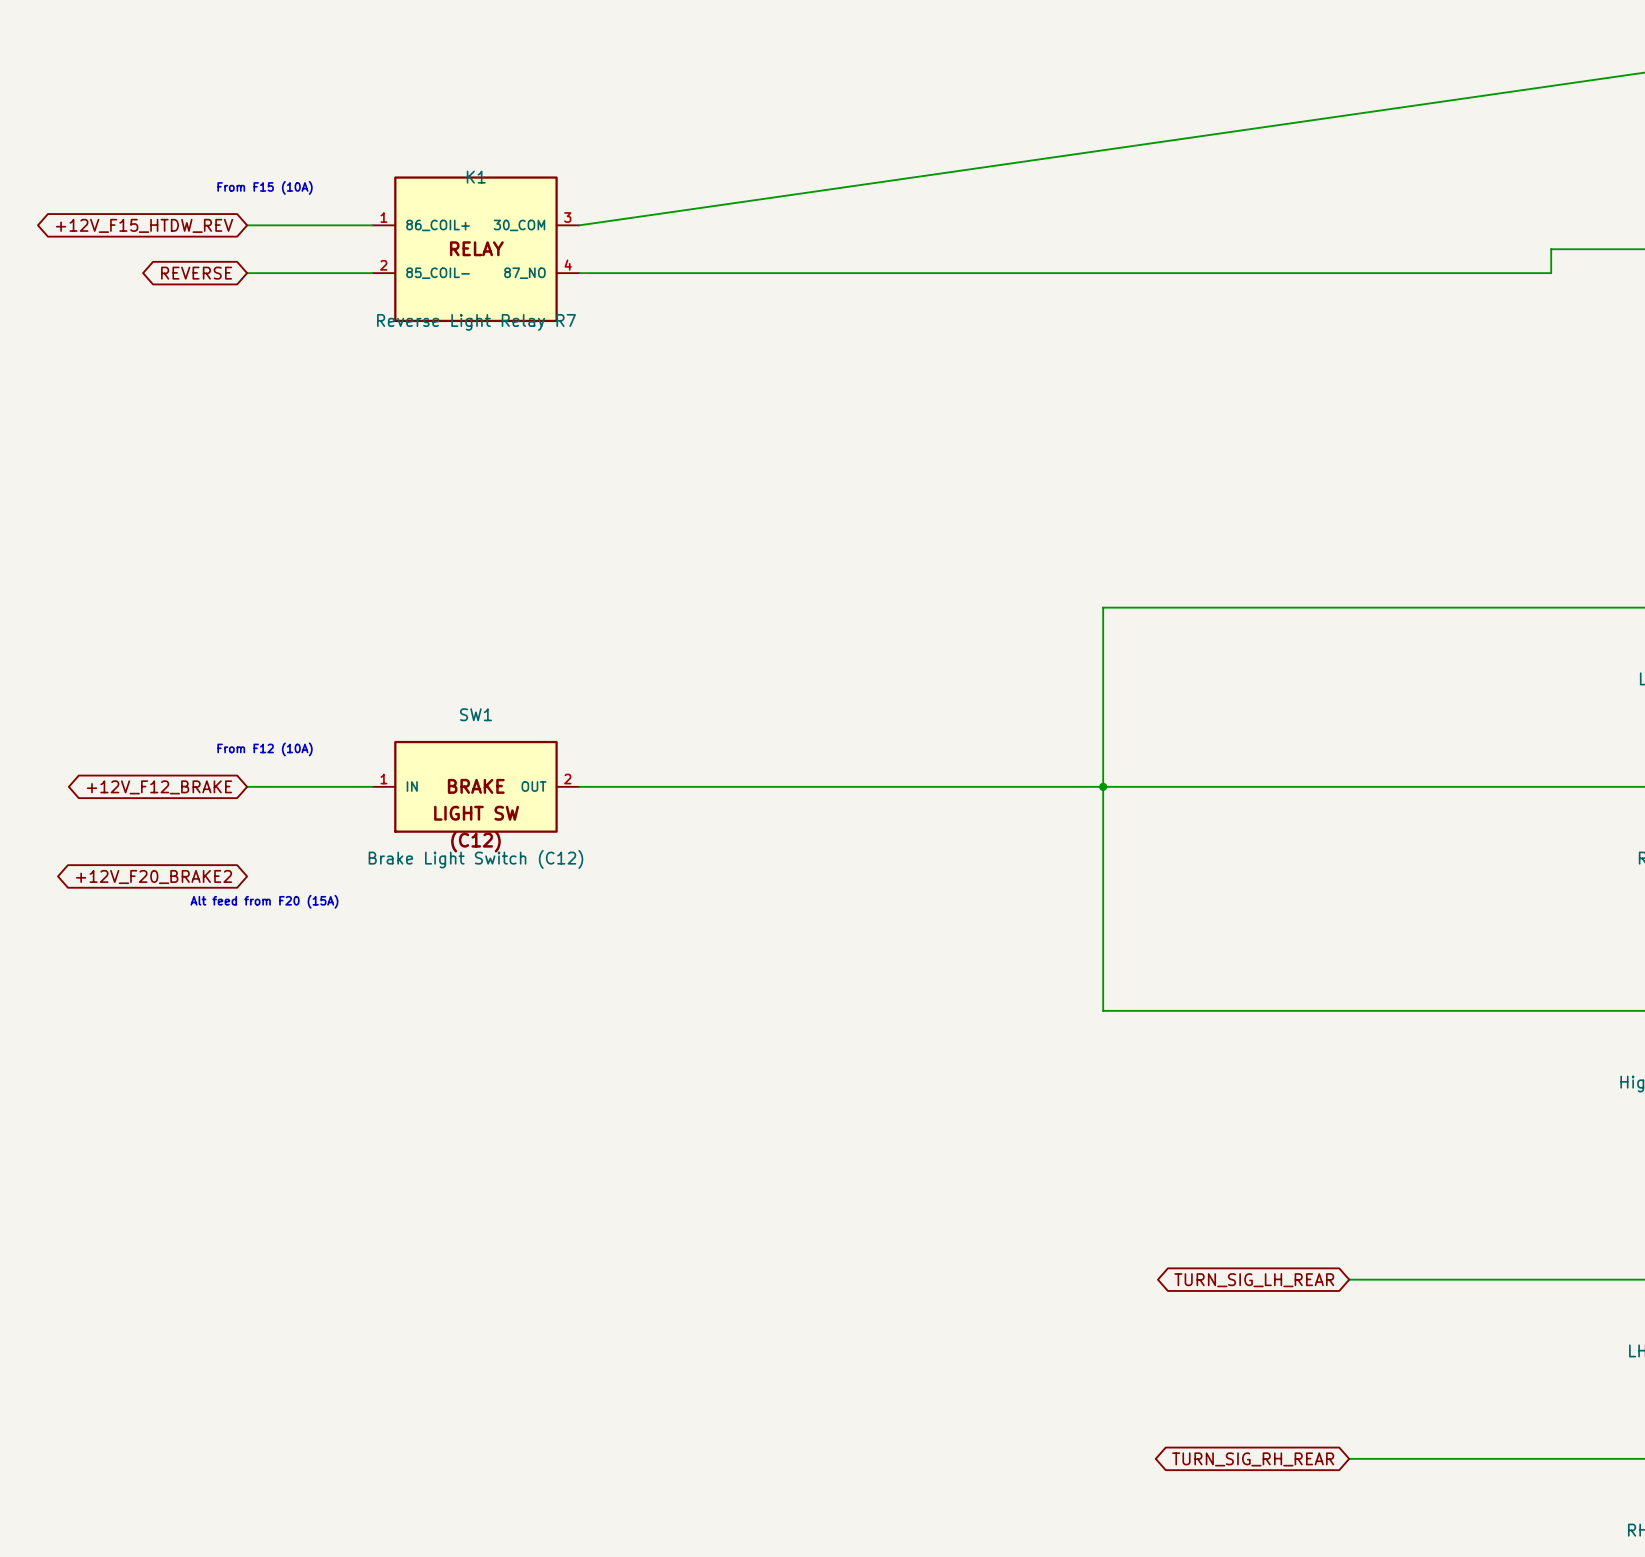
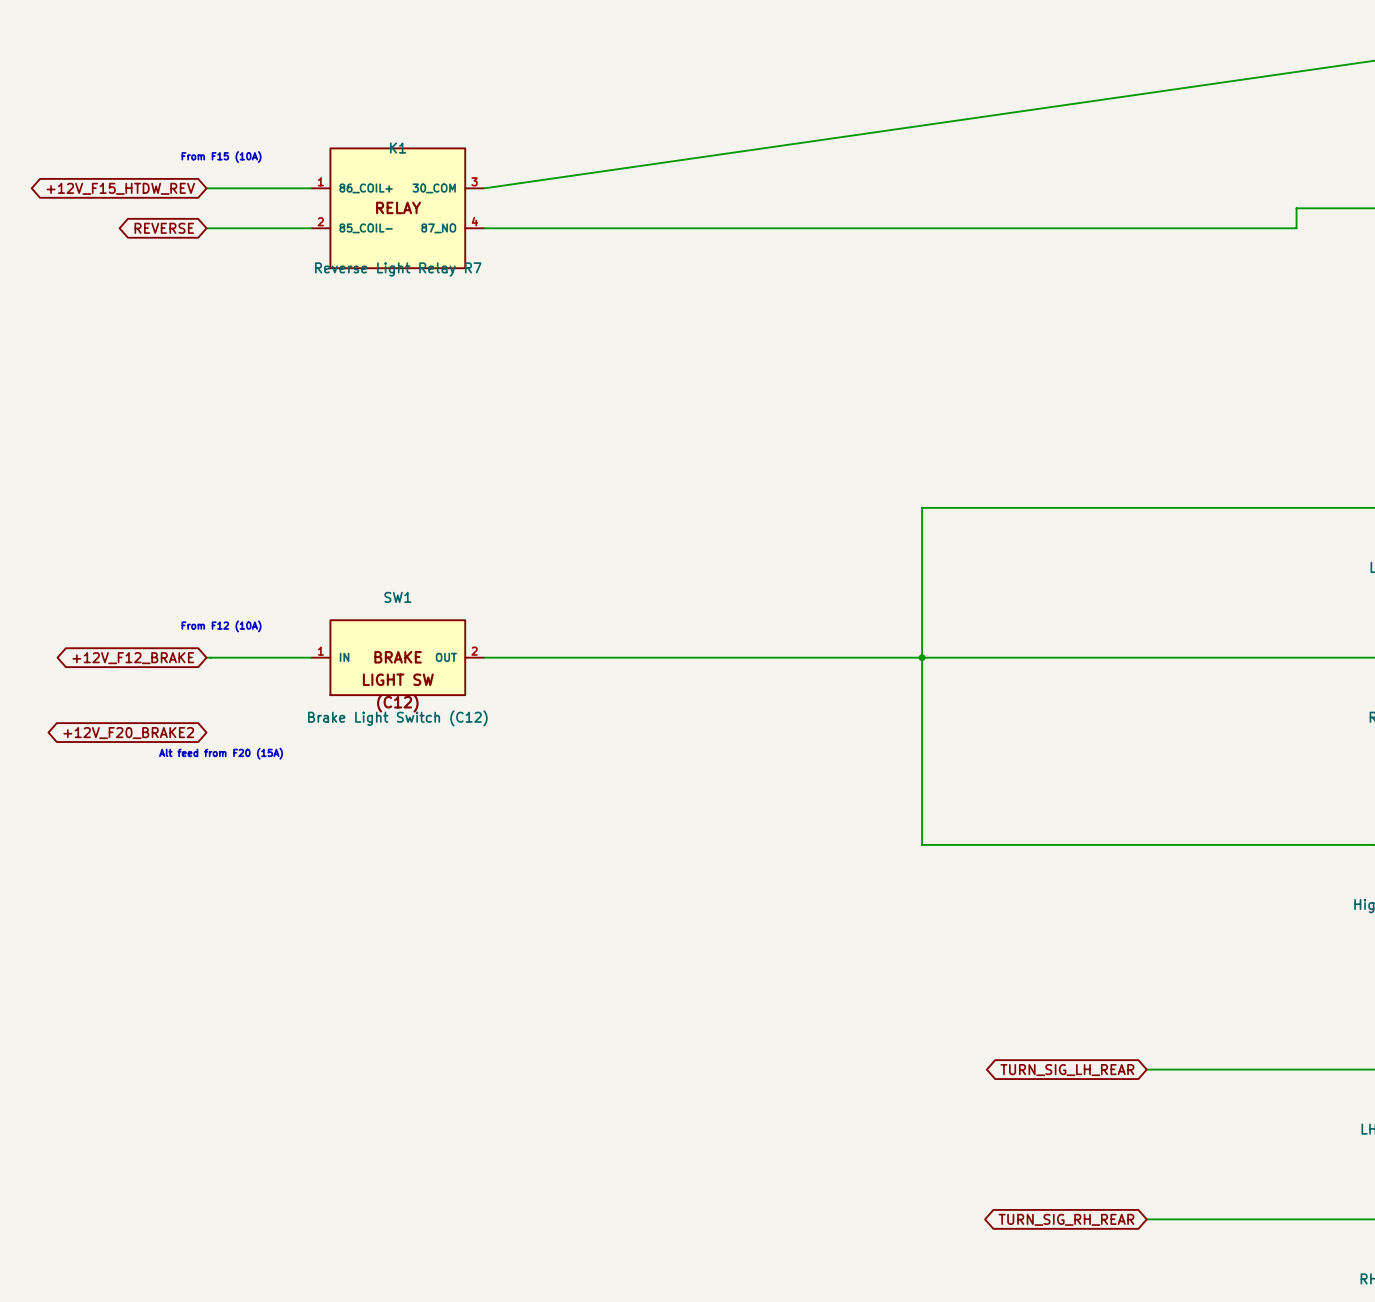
wire: (1349, 1279) (1371, 1279) -> none
global label position: TURN_SIG_LH_REAR (1254, 1280) -> TURN_SIG_LH_REAR (1067, 1070)
wire: (1349, 1458) (1371, 1458) -> none
global label position: TURN_SIG_RH_REAR (1253, 1459) -> TURN_SIG_RH_REAR (1066, 1219)

